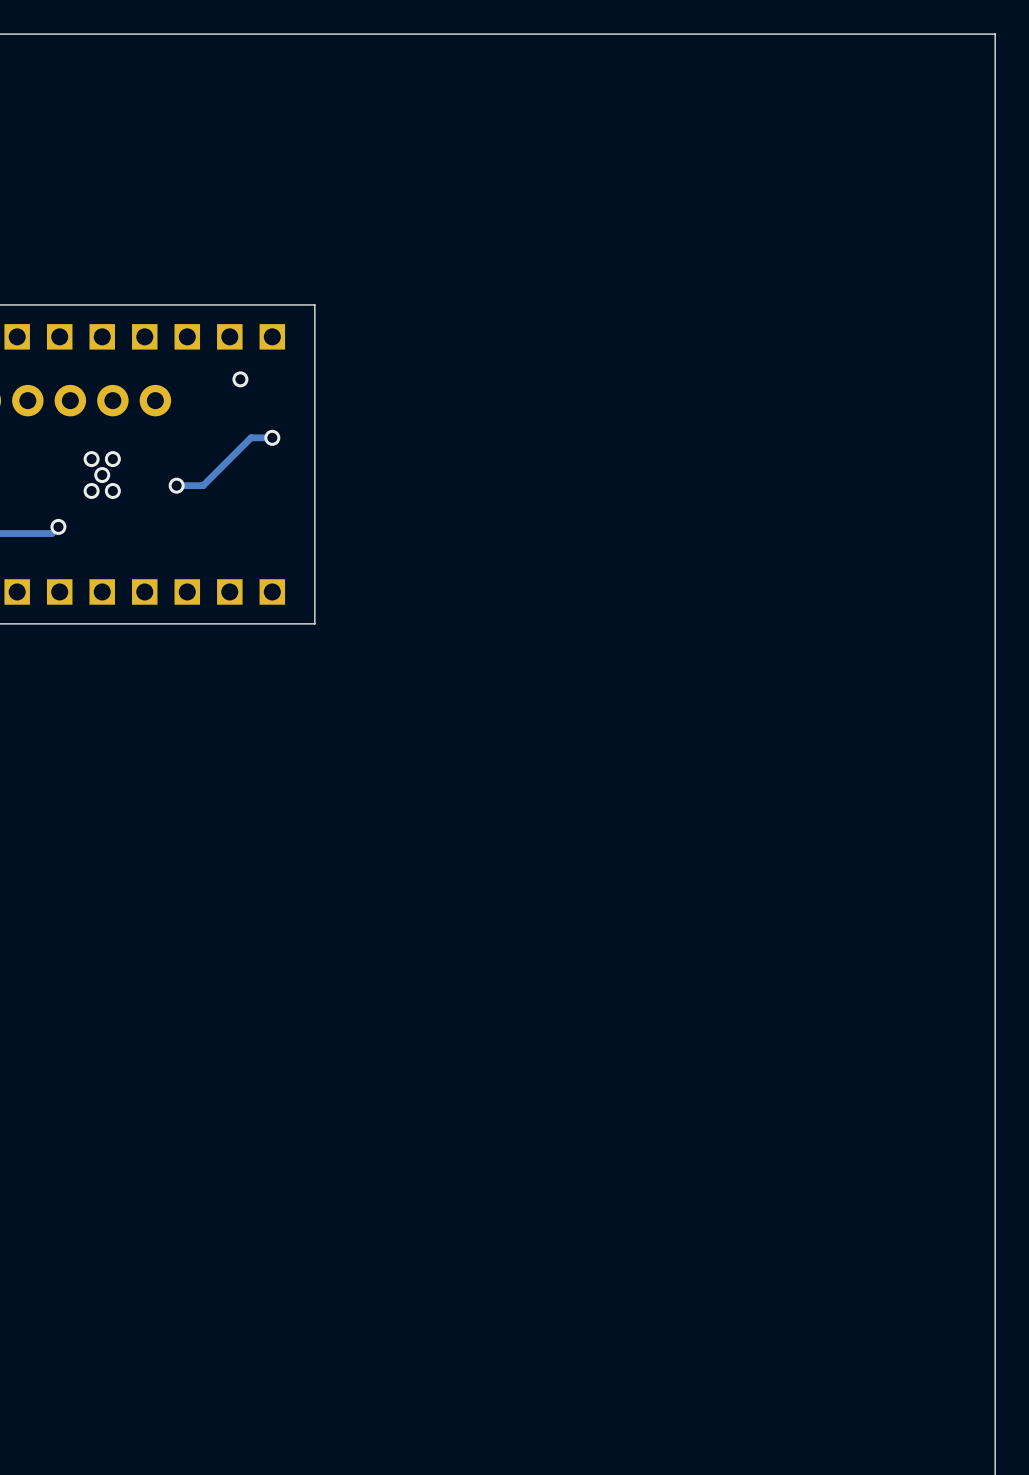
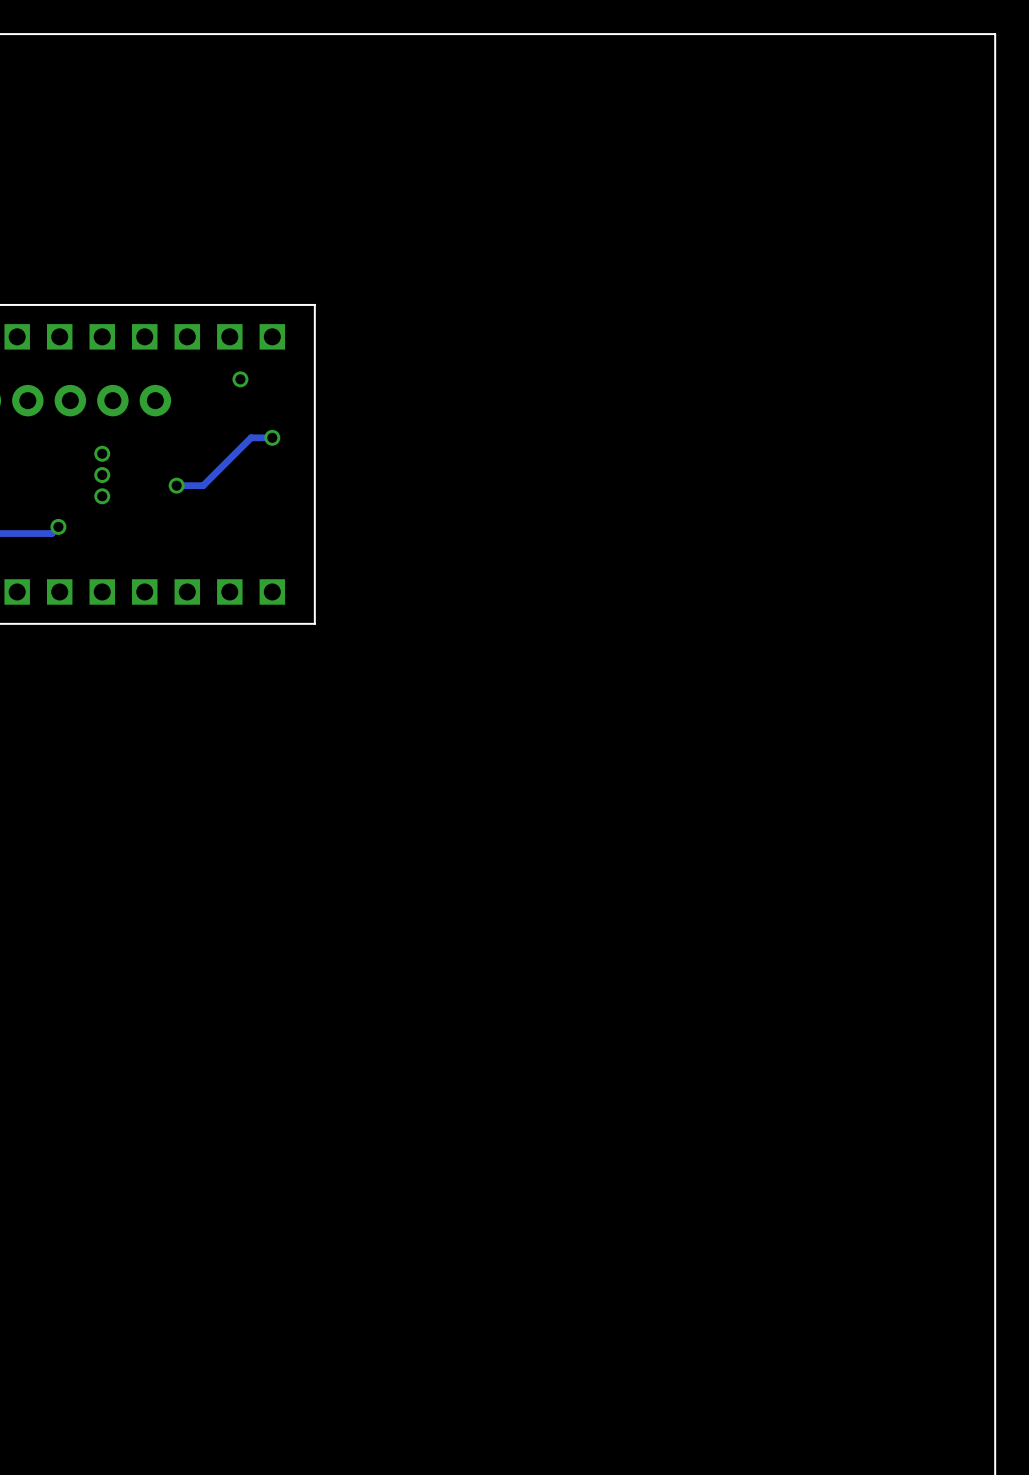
via: none -> (102, 453)
via: (91, 459) -> none
via: (112, 459) -> none
via: (91, 490) -> none
via: (112, 490) -> none
via: none -> (102, 496)

